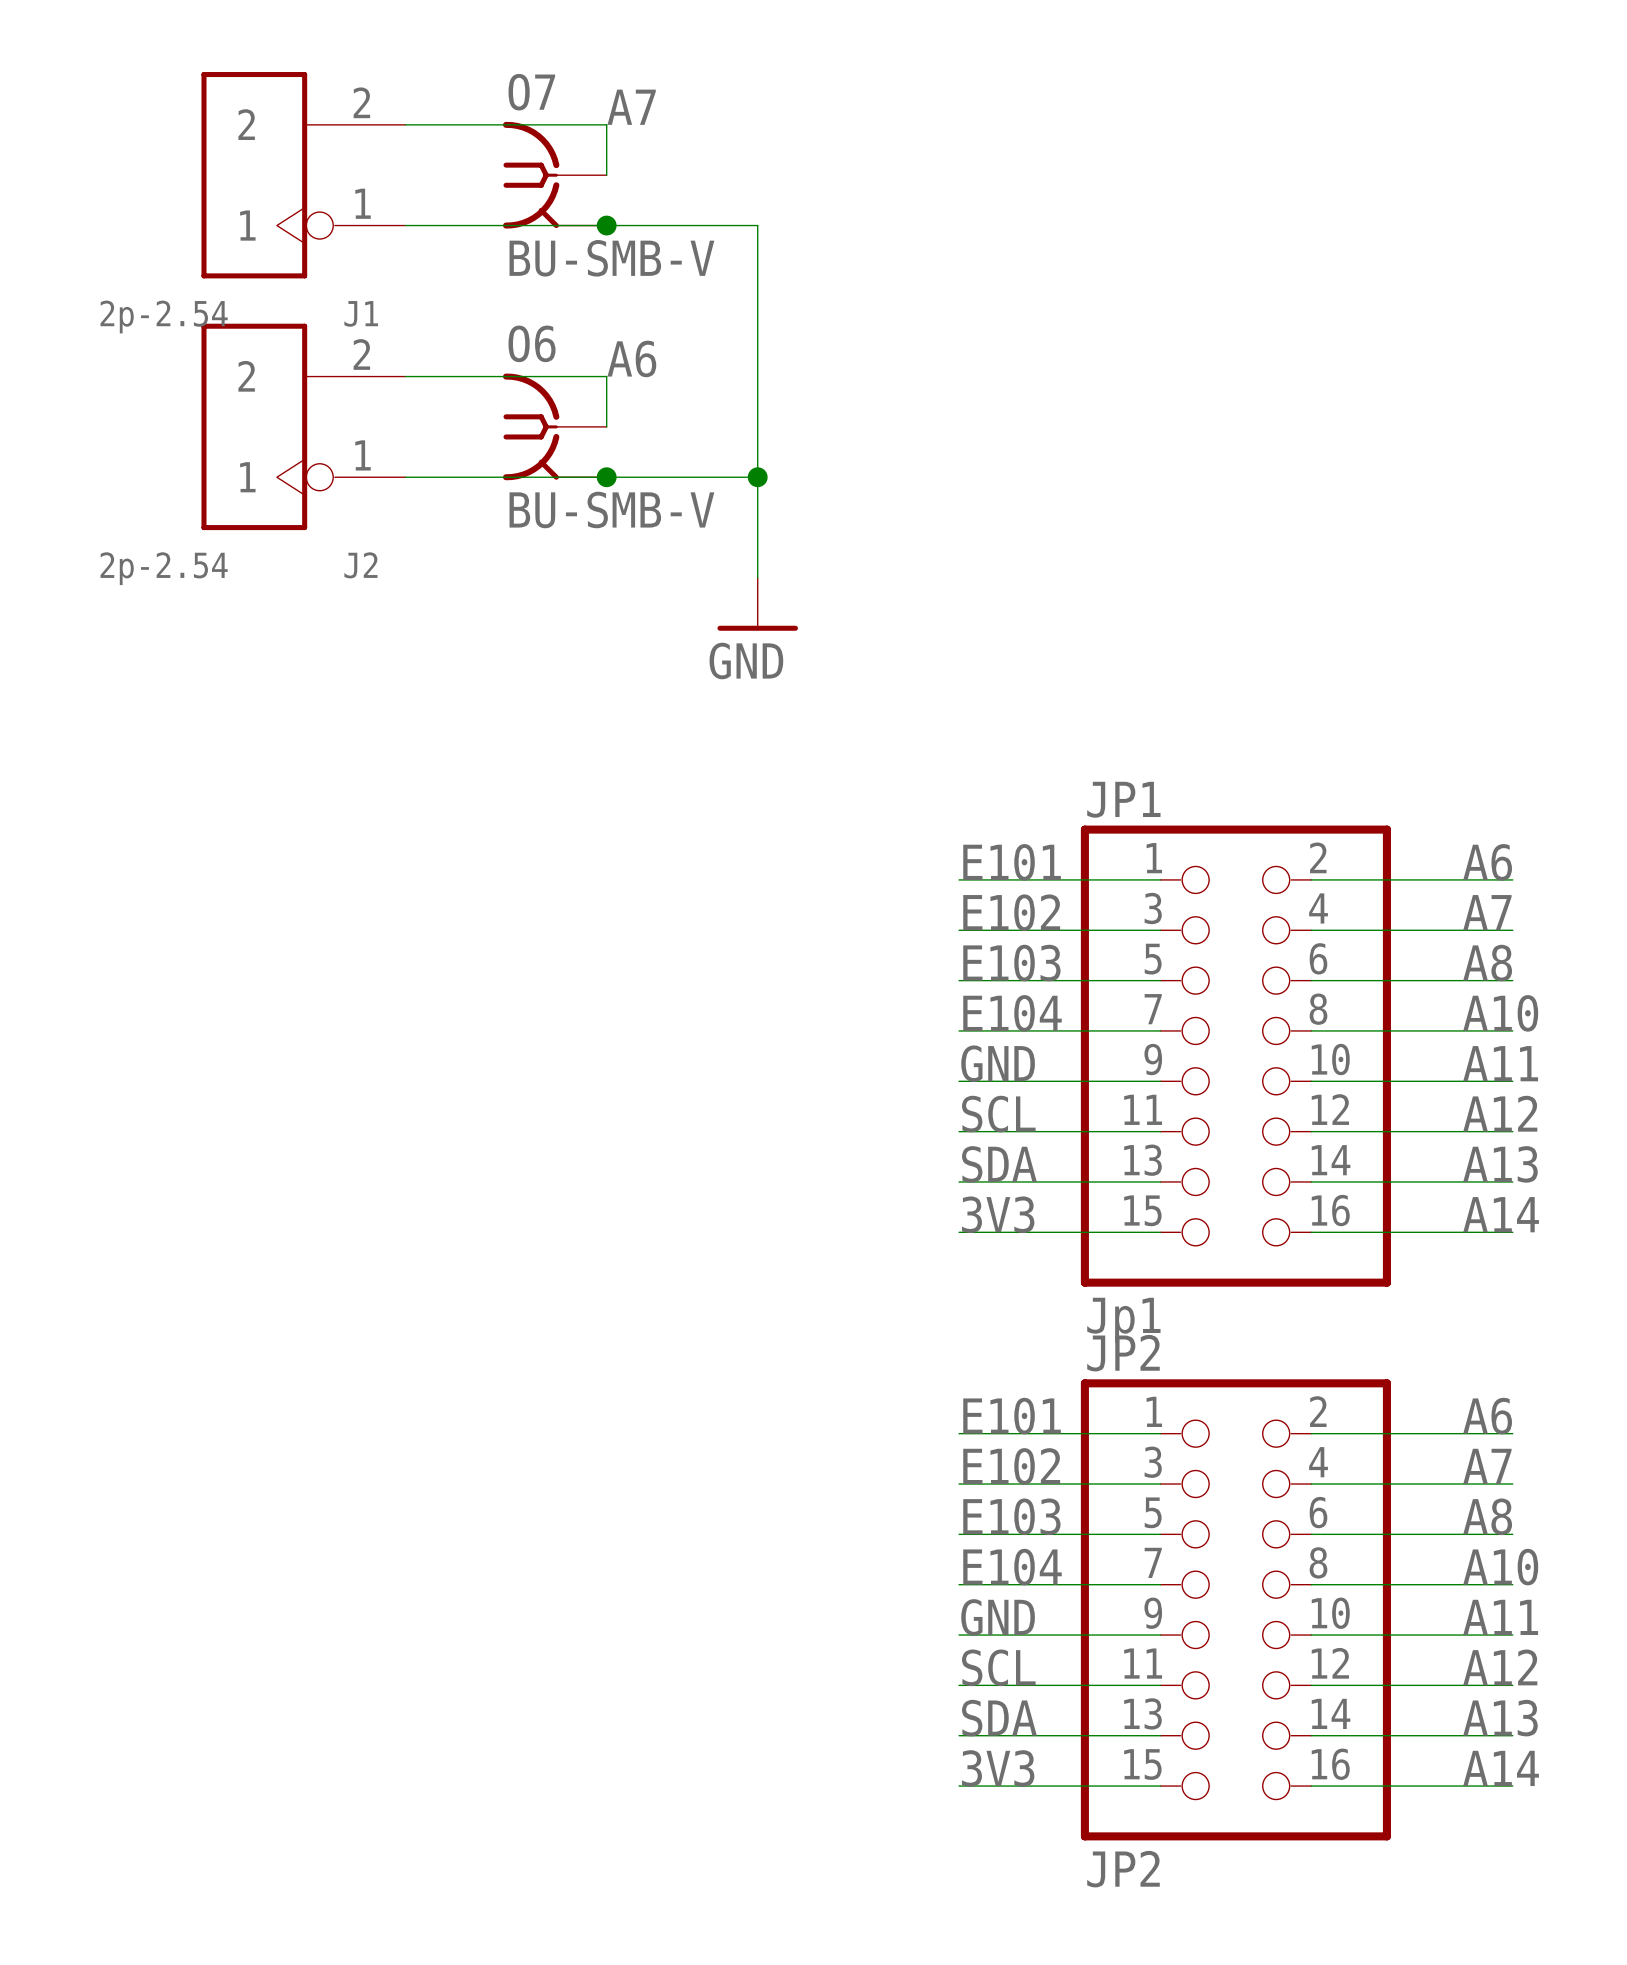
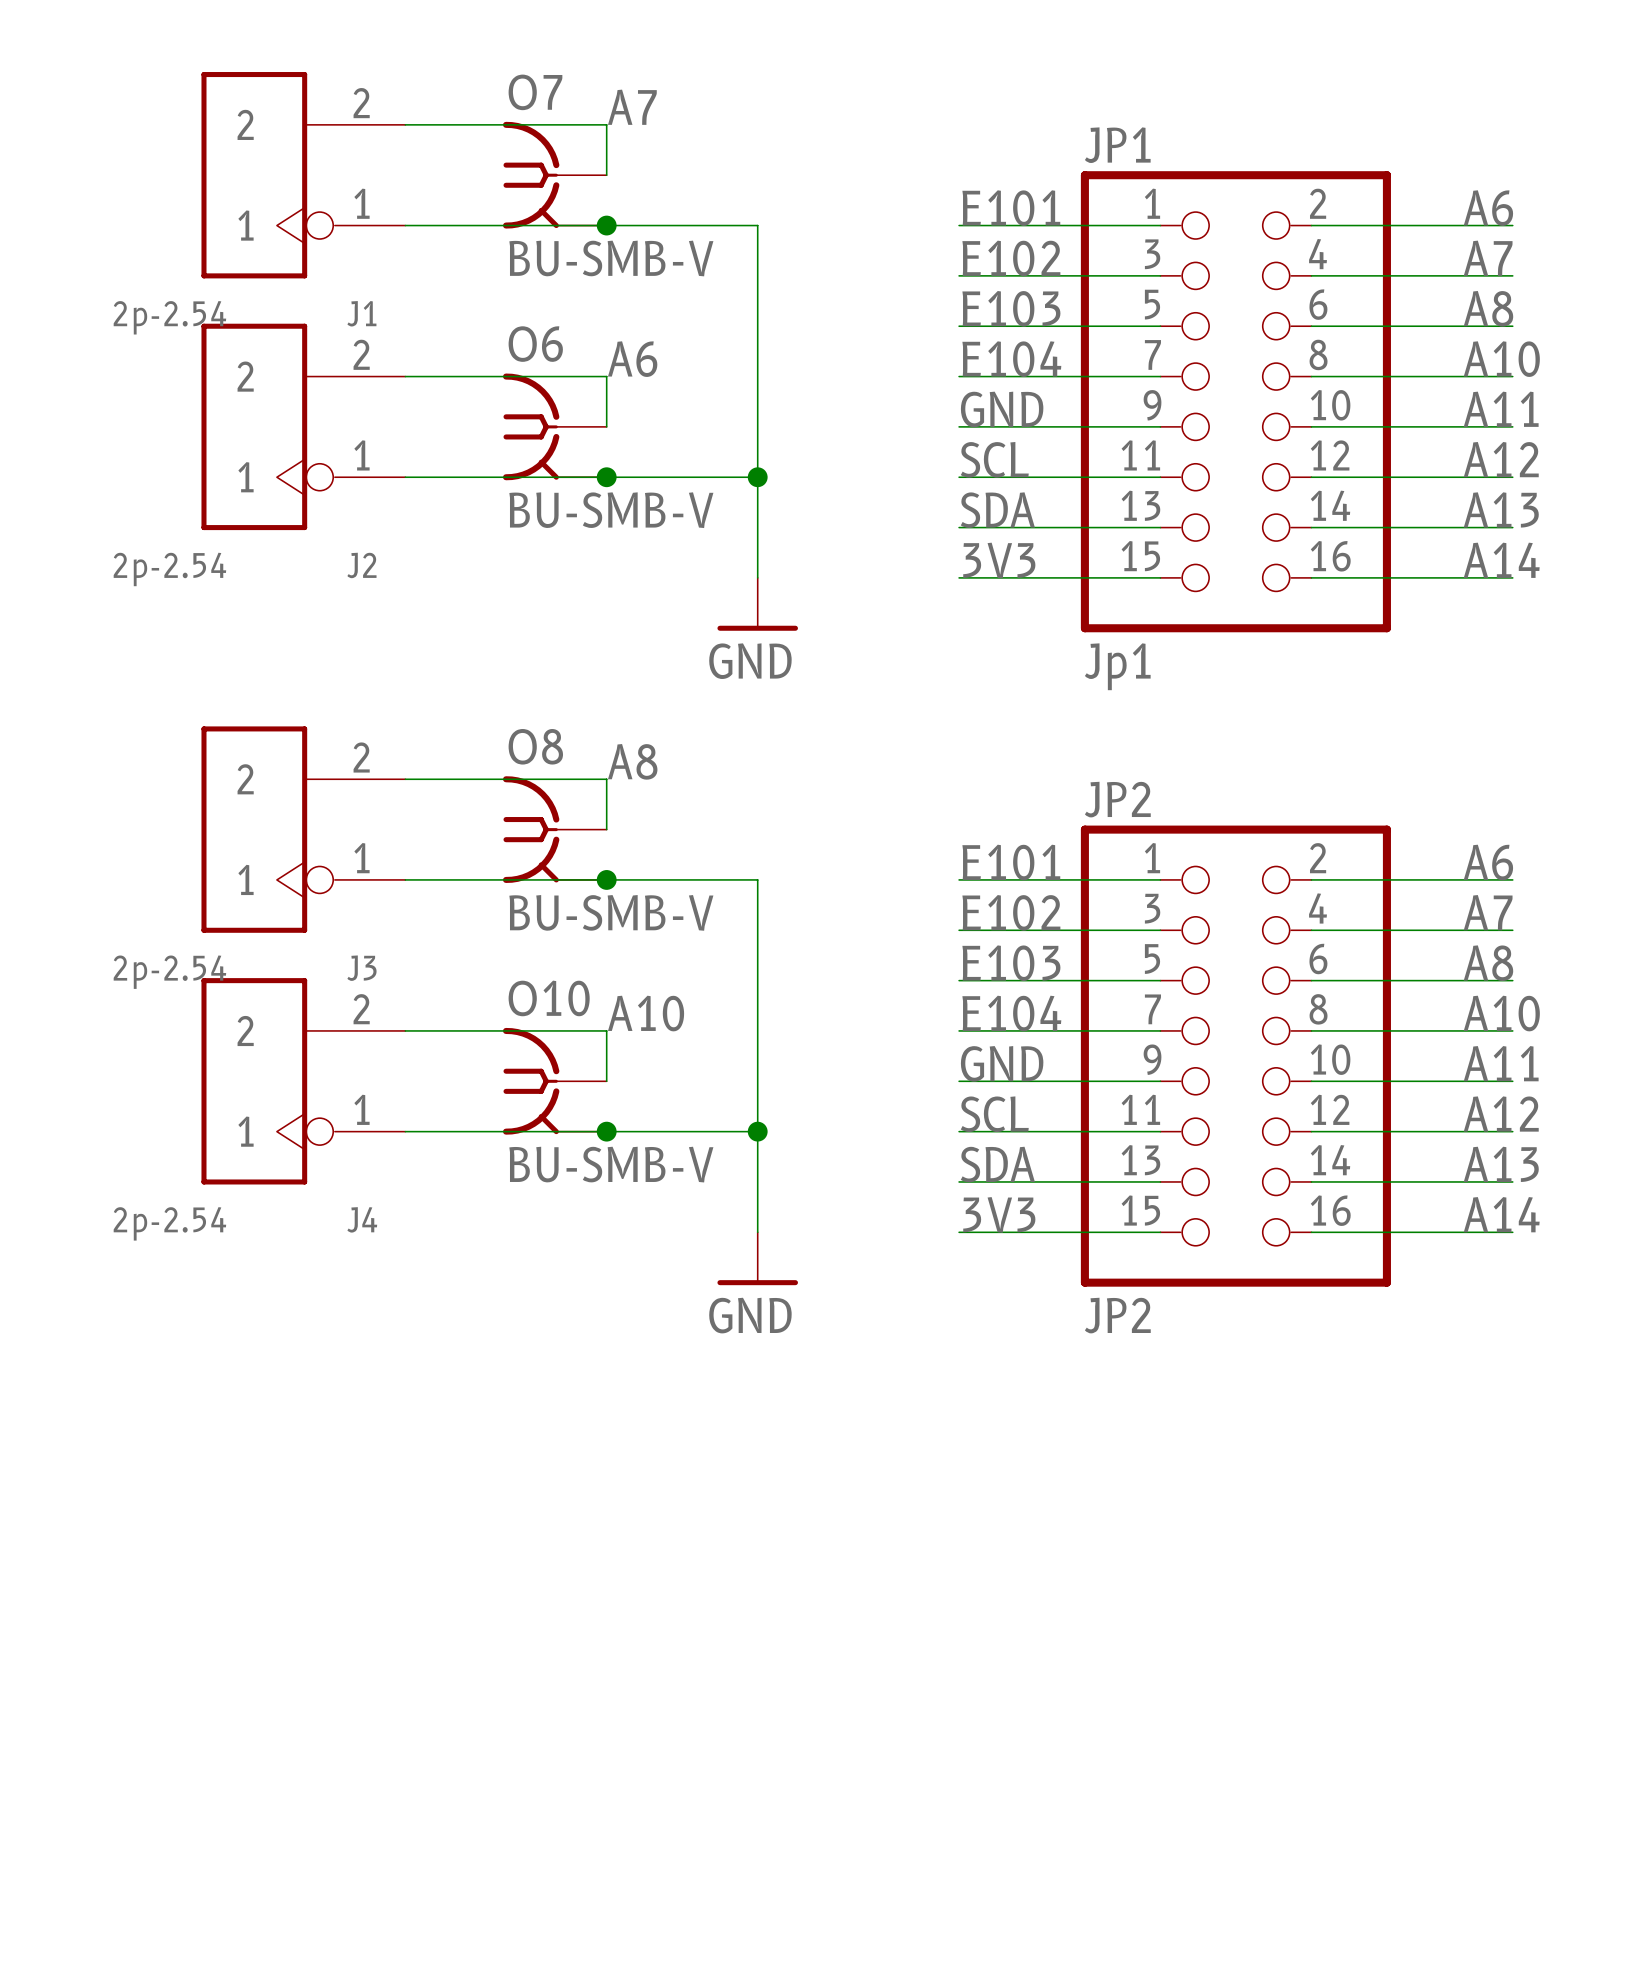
label: none -> E101 (1011, 208)
label: none -> A6 (1488, 208)
wire: none -> (959, 225) (1160, 225)
wire: none -> (1311, 225) (1512, 225)
label: none -> E102 (1011, 258)
label: none -> A7 (1488, 258)
wire: none -> (959, 275) (1160, 275)
wire: none -> (1311, 275) (1512, 275)
label: none -> E103 (1011, 308)
label: none -> A8 (1488, 308)
wire: none -> (959, 326) (1160, 326)
wire: none -> (1311, 326) (1512, 326)
label: none -> E104 (1011, 359)
label: none -> A10 (1501, 359)
wire: none -> (959, 376) (1160, 376)
wire: none -> (1311, 376) (1512, 376)
JP1: none -> Jp1 (1235, 401)
label: none -> GND (1002, 409)
label: none -> A11 (1501, 409)
wire: none -> (959, 426) (1160, 426)
wire: none -> (1311, 426) (1512, 426)
label: none -> SCL (994, 459)
label: none -> A12 (1501, 459)
wire: none -> (959, 477) (1160, 477)
wire: none -> (1311, 477) (1512, 477)
label: none -> SDA (997, 510)
label: none -> A13 (1501, 509)
wire: none -> (959, 527) (1160, 527)
wire: none -> (1311, 527) (1512, 527)
label: none -> 3V3 (999, 560)
label: none -> A14 (1501, 560)
wire: none -> (959, 577) (1160, 577)
wire: none -> (1311, 577) (1512, 577)
label: none -> A8 (632, 761)
wire: none -> (405, 779) (606, 779) (606, 829)
JP1 name: JP1 (1123, 799) -> JP2 (1117, 799)
J3: none -> 2p-2.54 (303, 829)
O8: none -> BU-SMB-V (554, 829)
wire: none -> (405, 879) (757, 879) (757, 1232)
junction: none -> (606, 879)
label: none -> A10 (646, 1013)
wire: none -> (405, 1030) (606, 1030) (606, 1081)
J4: none -> 2p-2.54 (303, 1081)
O10: none -> BU-SMB-V (554, 1081)
wire: none -> (405, 1131) (757, 1131)
junction: none -> (606, 1131)
junction: none -> (757, 1131)
power symbol: none -> GND (757, 1258)
JP1 value: Jp1 (1123, 1320) -> JP2 (1117, 1315)
label: E101 (1012, 1416) -> none
label: A6 (1487, 1416) -> none
wire: (959, 1433) (1160, 1433) -> none
wire: (1311, 1433) (1512, 1433) -> none
label: E102 (1011, 1466) -> none
label: A7 (1487, 1466) -> none
wire: (959, 1484) (1160, 1484) -> none
wire: (1311, 1484) (1512, 1484) -> none
label: E103 (1011, 1516) -> none
label: A8 (1487, 1516) -> none
wire: (959, 1534) (1160, 1534) -> none
wire: (1311, 1534) (1512, 1534) -> none
label: E104 (1012, 1567) -> none
label: A10 (1500, 1567) -> none
wire: (959, 1584) (1160, 1584) -> none
wire: (1311, 1584) (1512, 1584) -> none
JP2: JP2 (1235, 1609) -> none
label: GND (998, 1617) -> none
label: A11 (1500, 1617) -> none
wire: (959, 1635) (1160, 1635) -> none
wire: (1311, 1635) (1512, 1635) -> none
label: SCL (998, 1667) -> none
label: A12 (1500, 1667) -> none
wire: (959, 1685) (1160, 1685) -> none
wire: (1311, 1685) (1512, 1685) -> none
label: SDA (999, 1718) -> none
label: A13 (1500, 1718) -> none
wire: (959, 1735) (1160, 1735) -> none
wire: (1311, 1735) (1512, 1735) -> none
label: 3V3 (998, 1768) -> none
label: A14 (1501, 1768) -> none
wire: (959, 1786) (1160, 1786) -> none
wire: (1311, 1786) (1512, 1786) -> none

